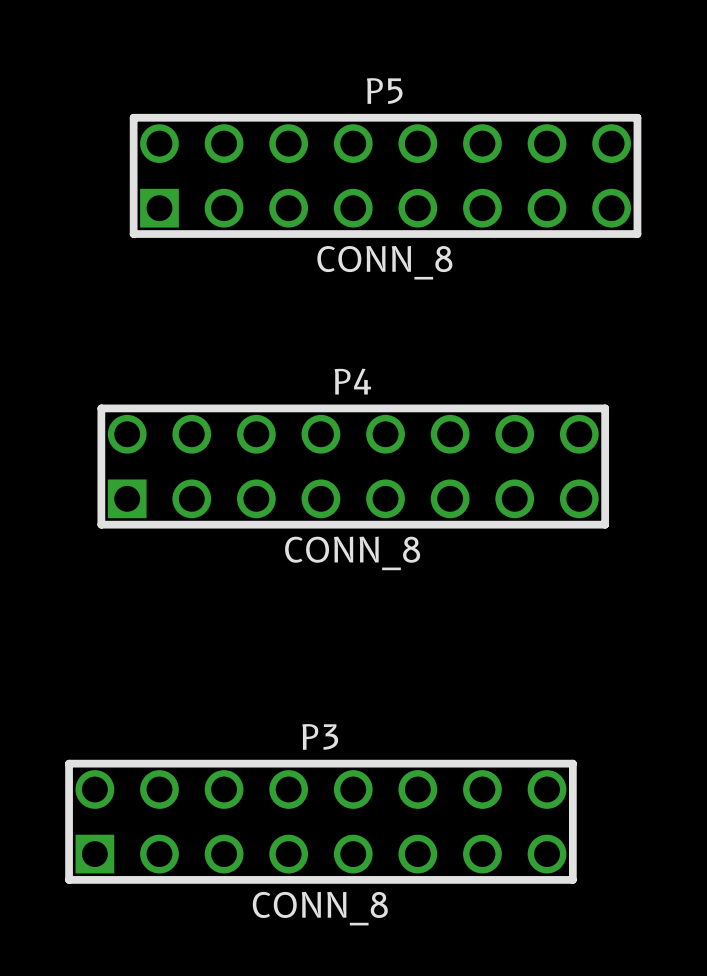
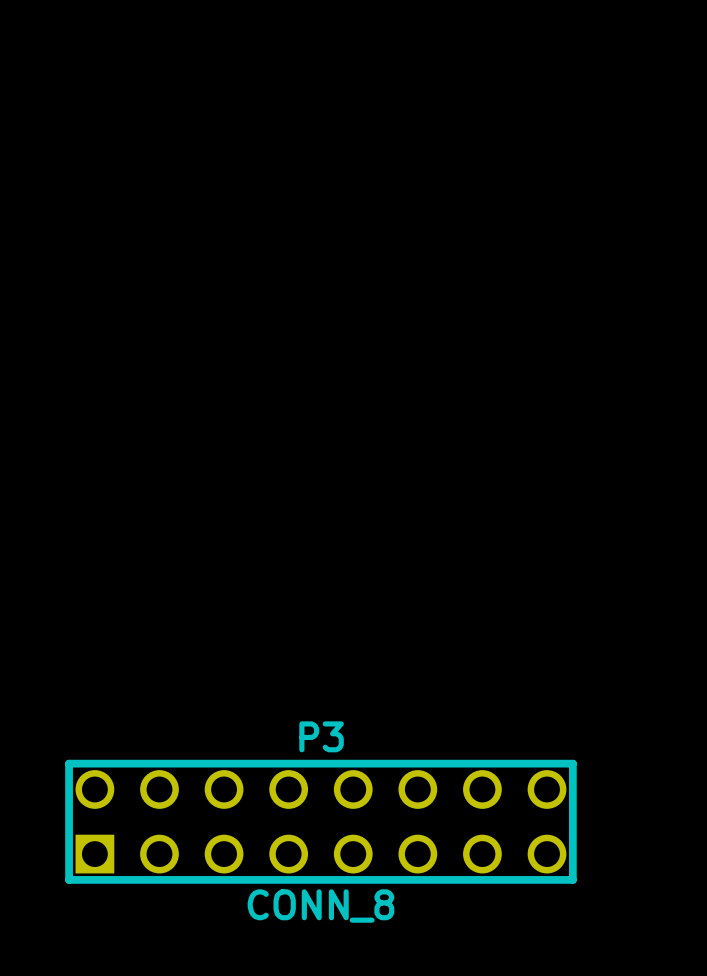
P5: CONN_8 (385, 175) -> none
P4: CONN_8 (353, 466) -> none

